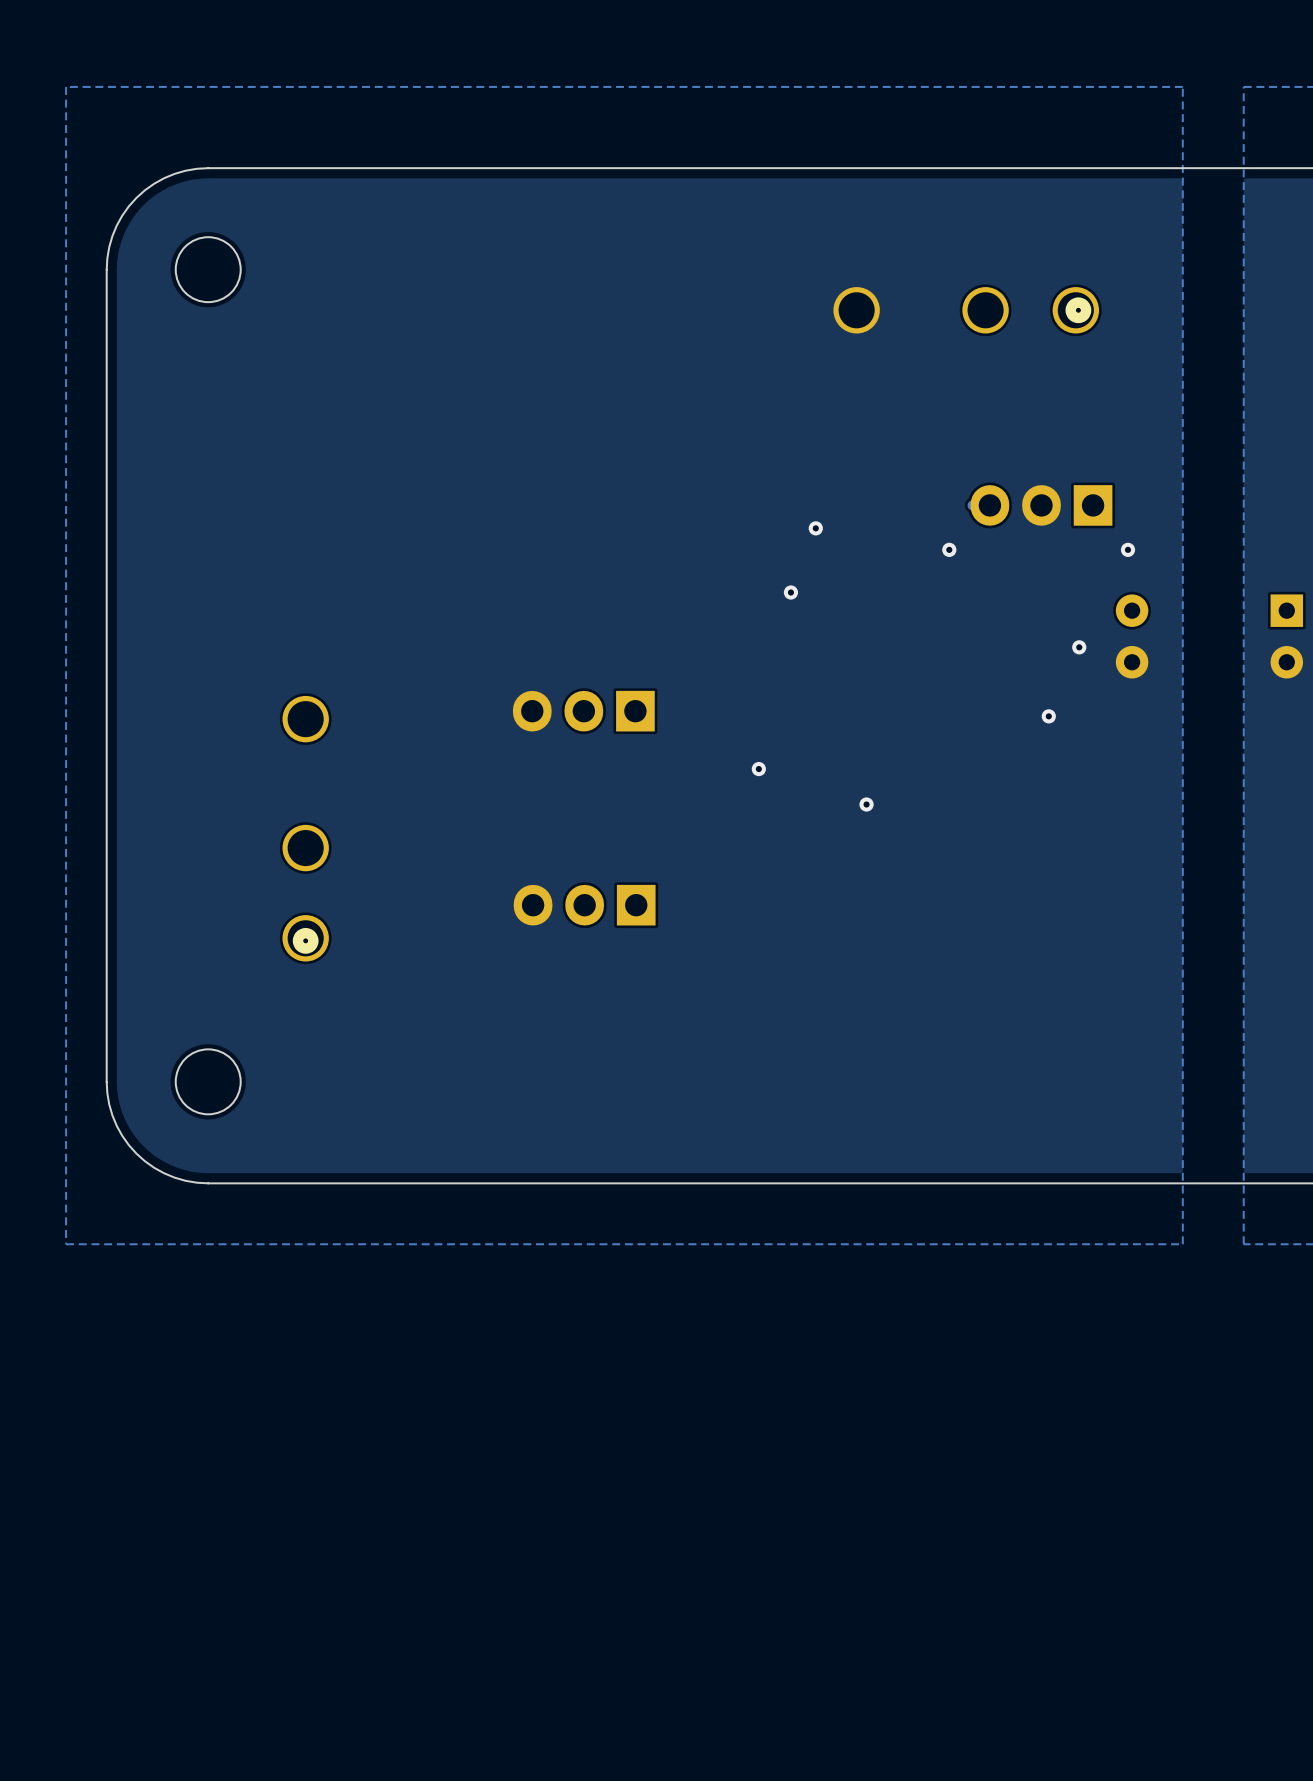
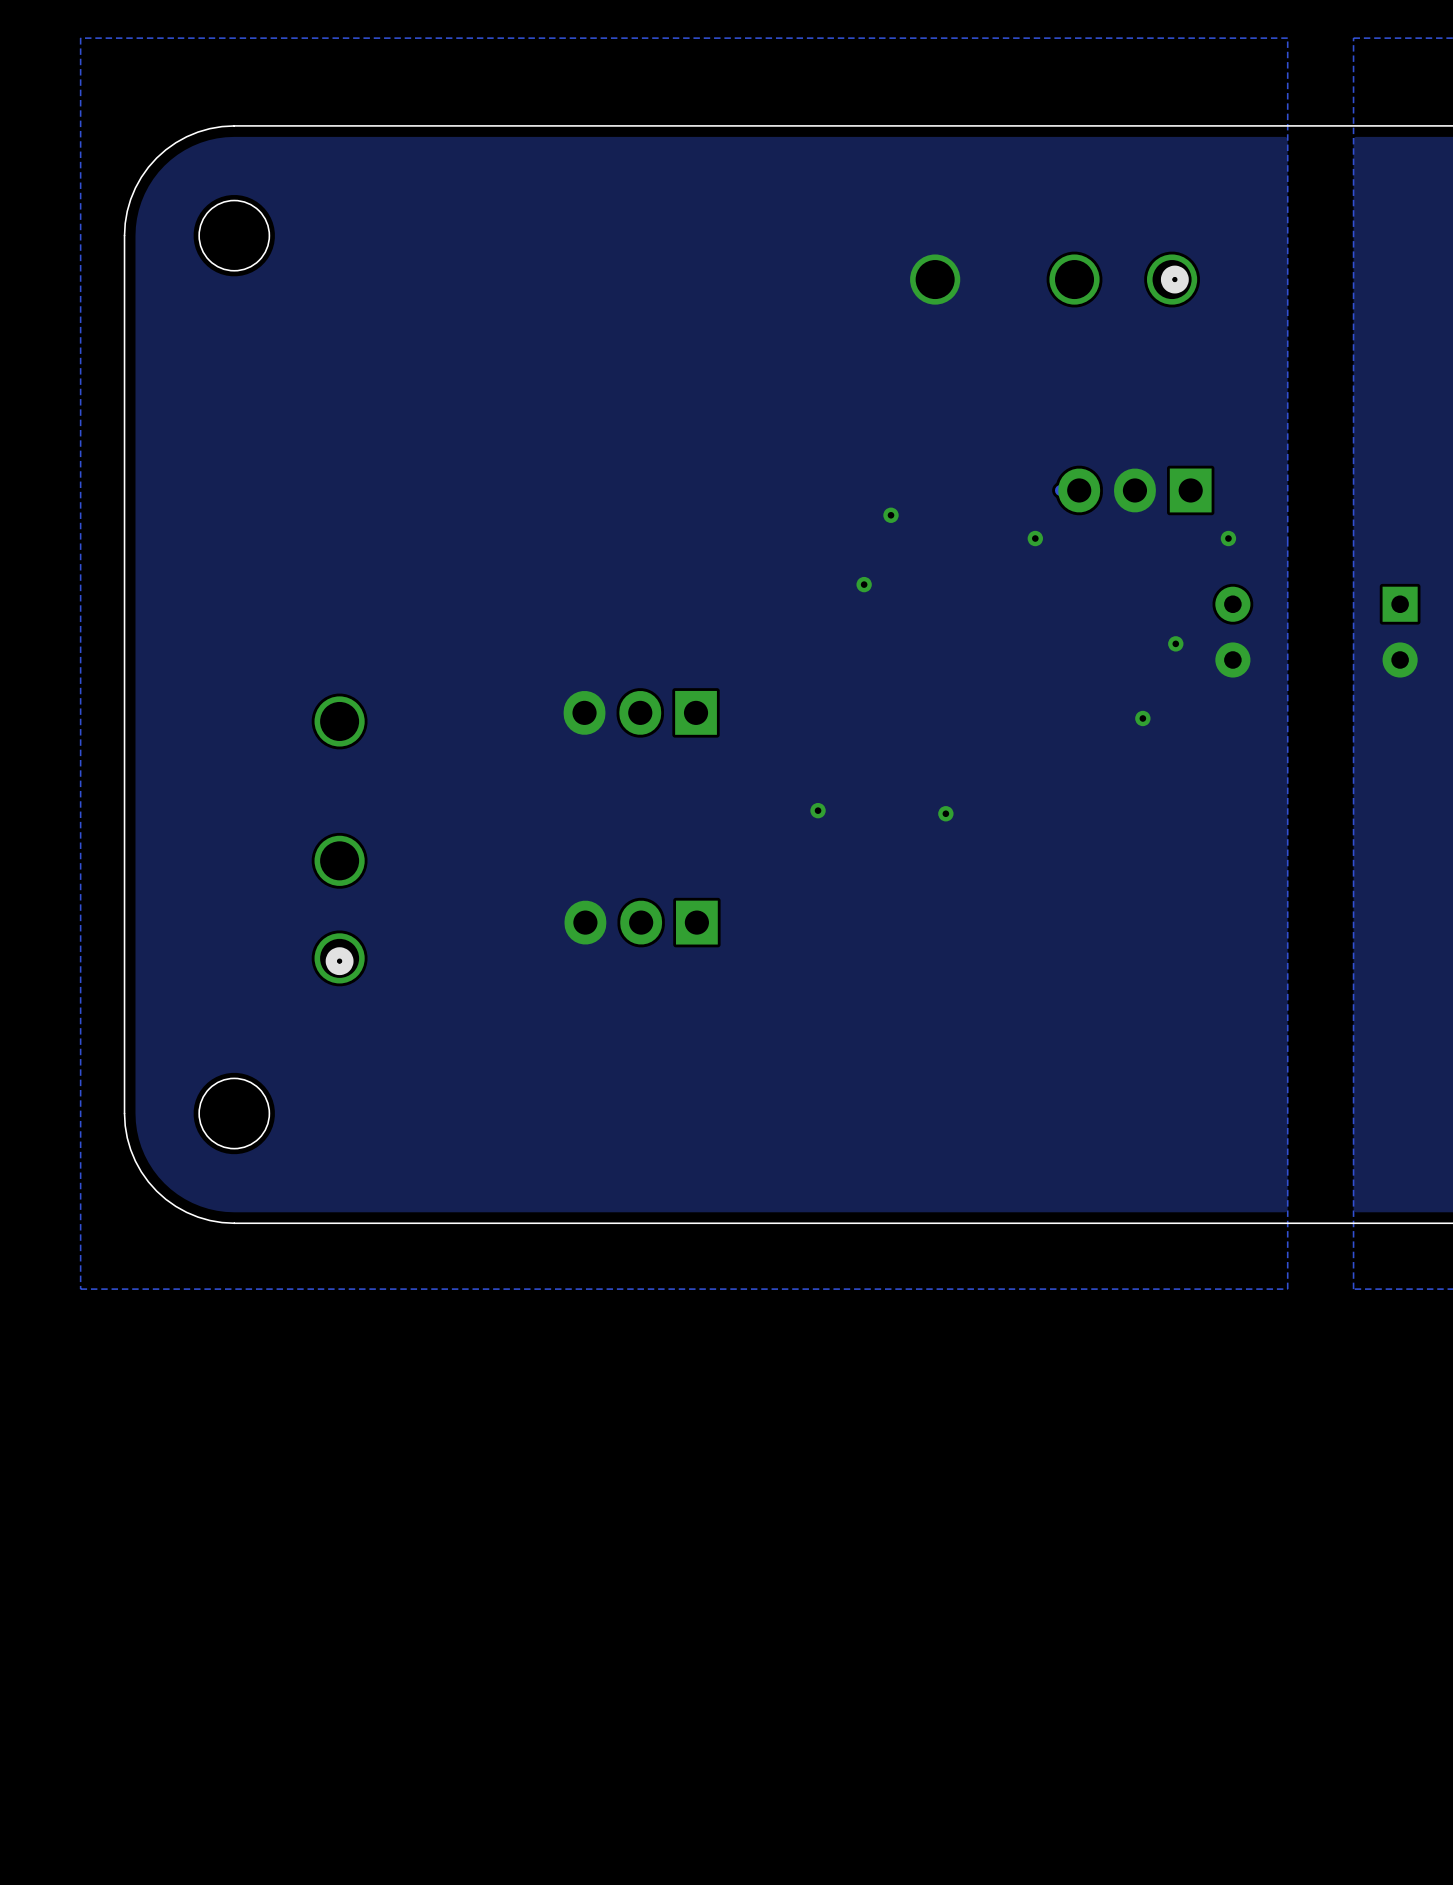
via position: (758, 769) -> (818, 810)

